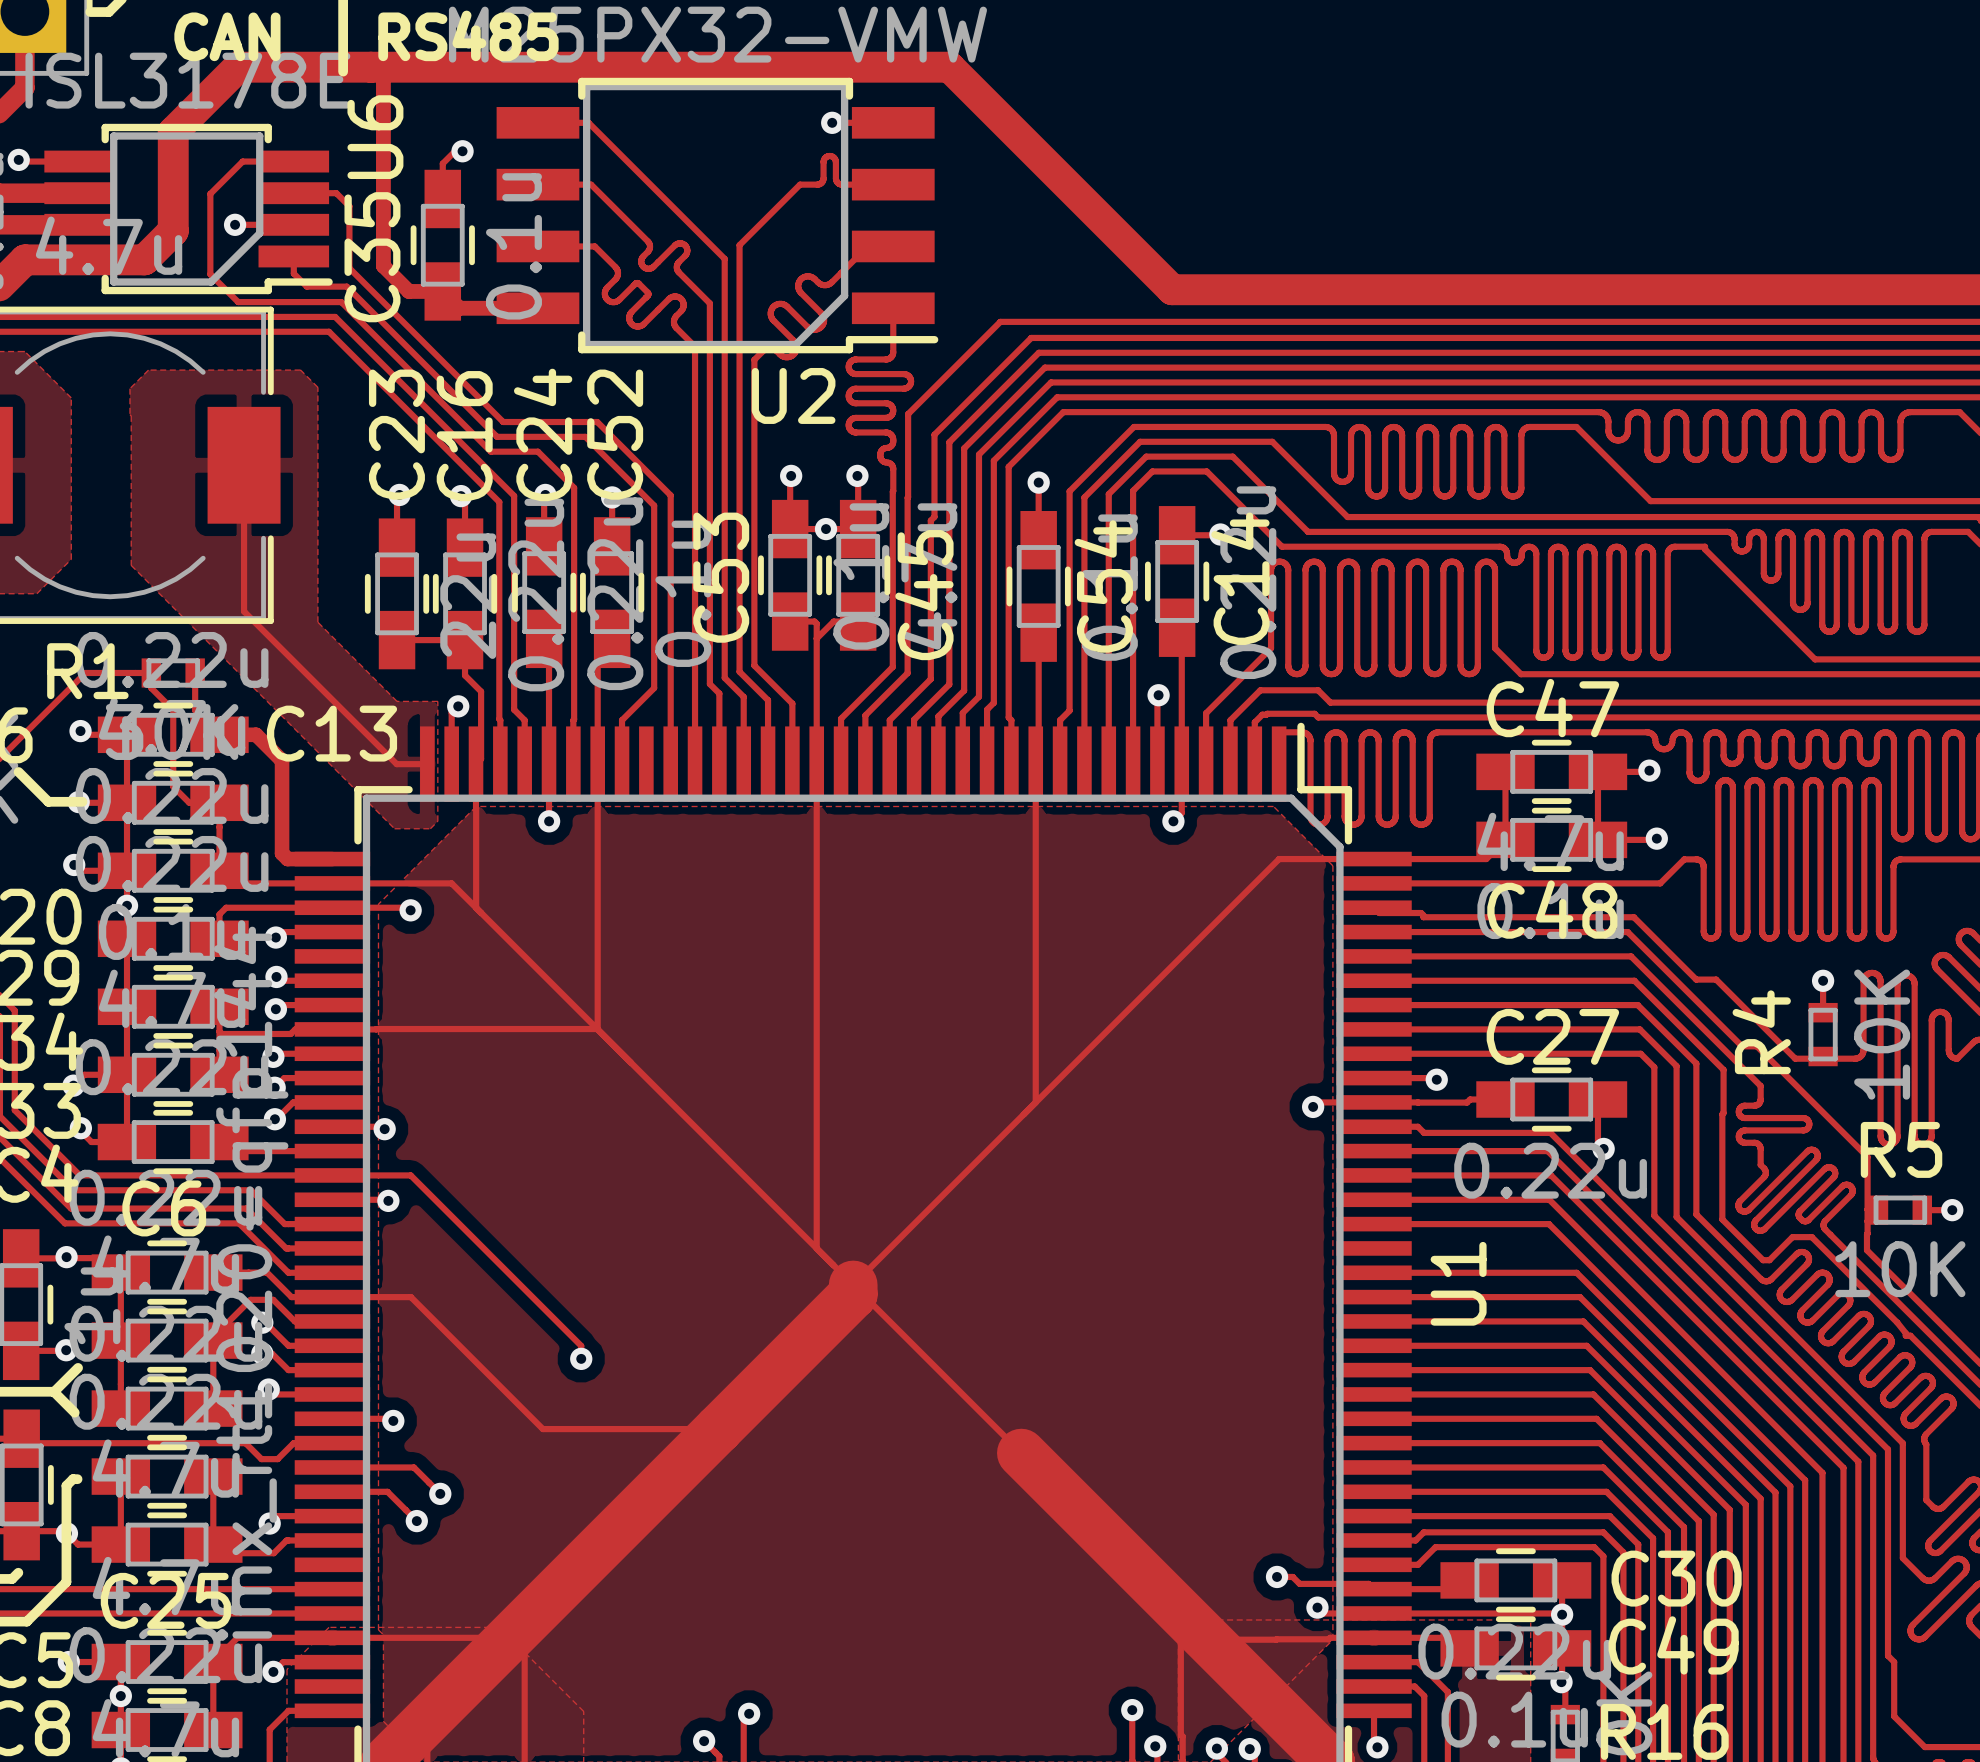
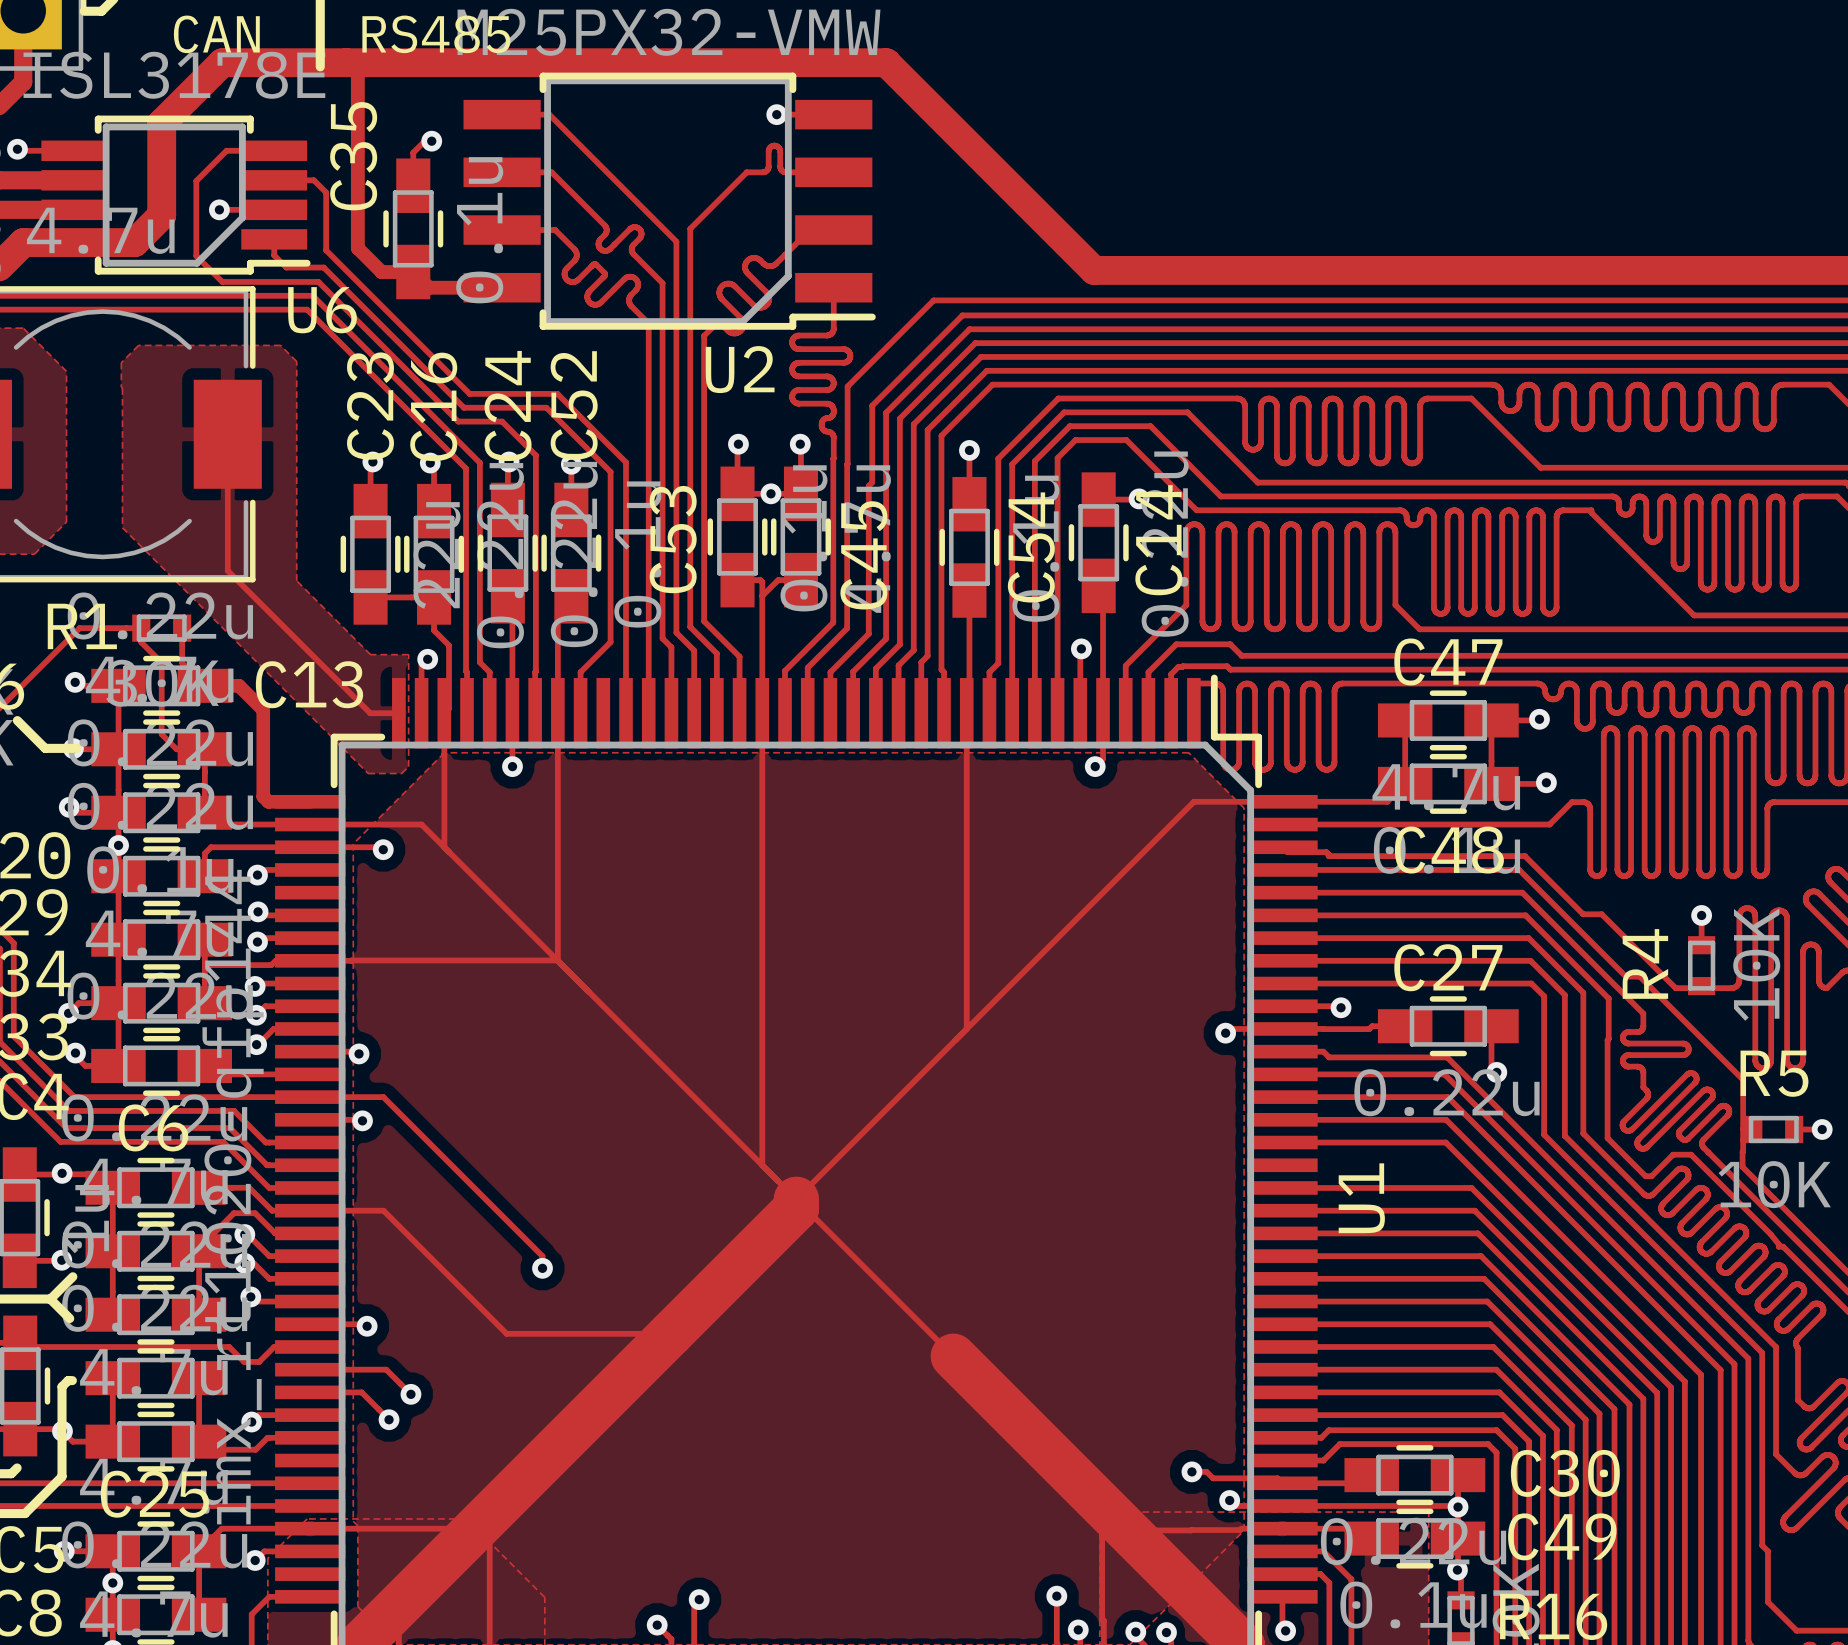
U6 name rotation: 0° (375, 137) -> 90° clockwise (322, 310)
U6 name position: U6 (375, 137) -> U6 (322, 310)
C35 name position: C35 (372, 257) -> C35 (353, 156)

